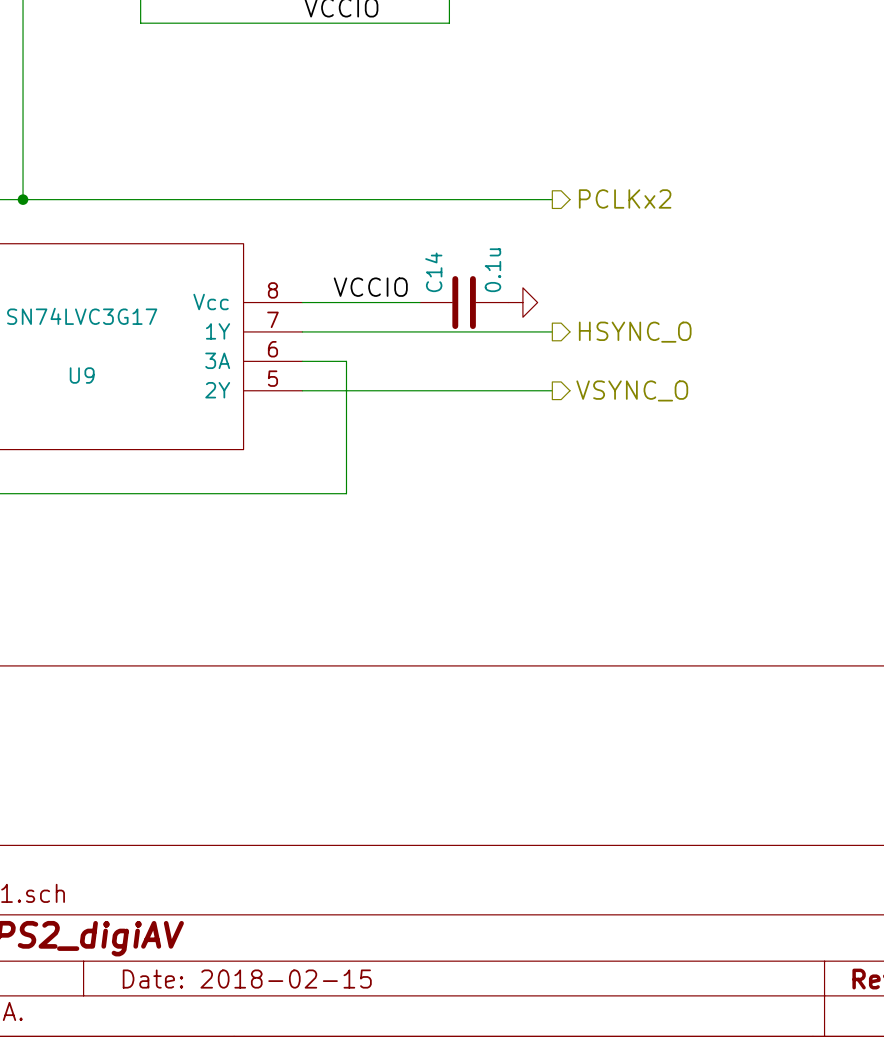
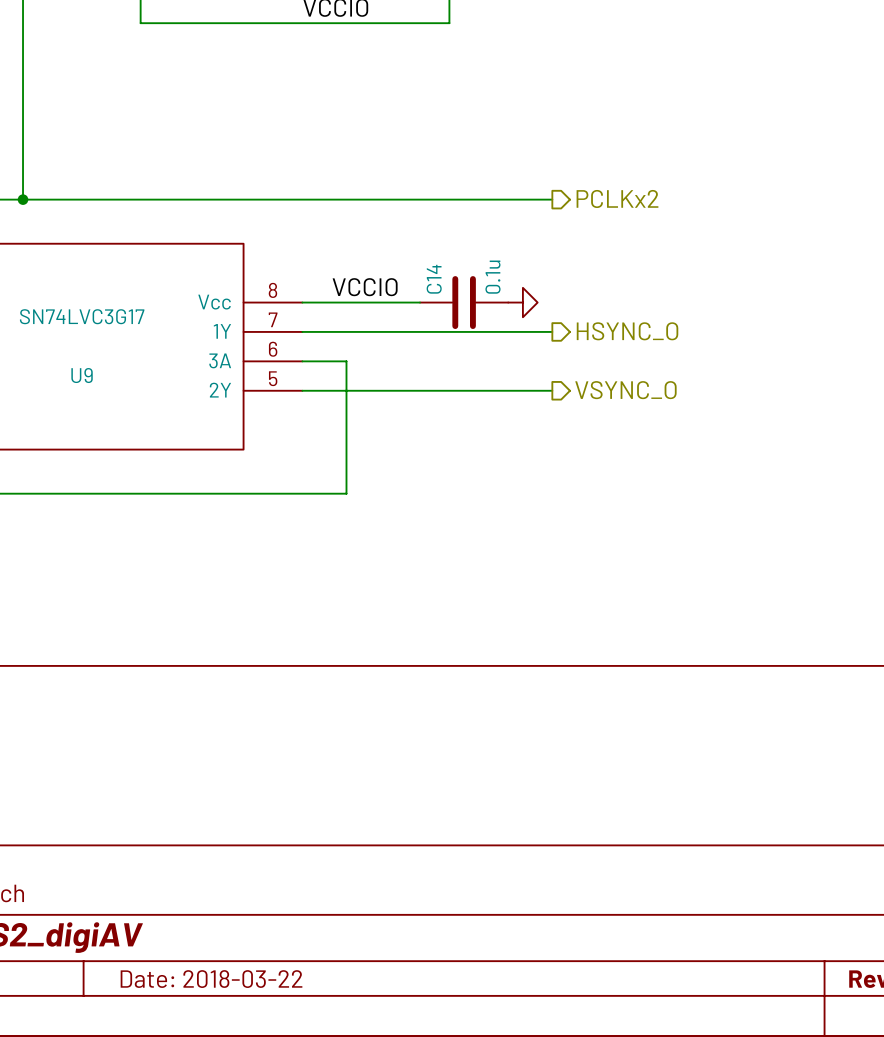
title block: Date: 2018-02-15 (247, 979) -> Date: 2018-03-22 (211, 979)

